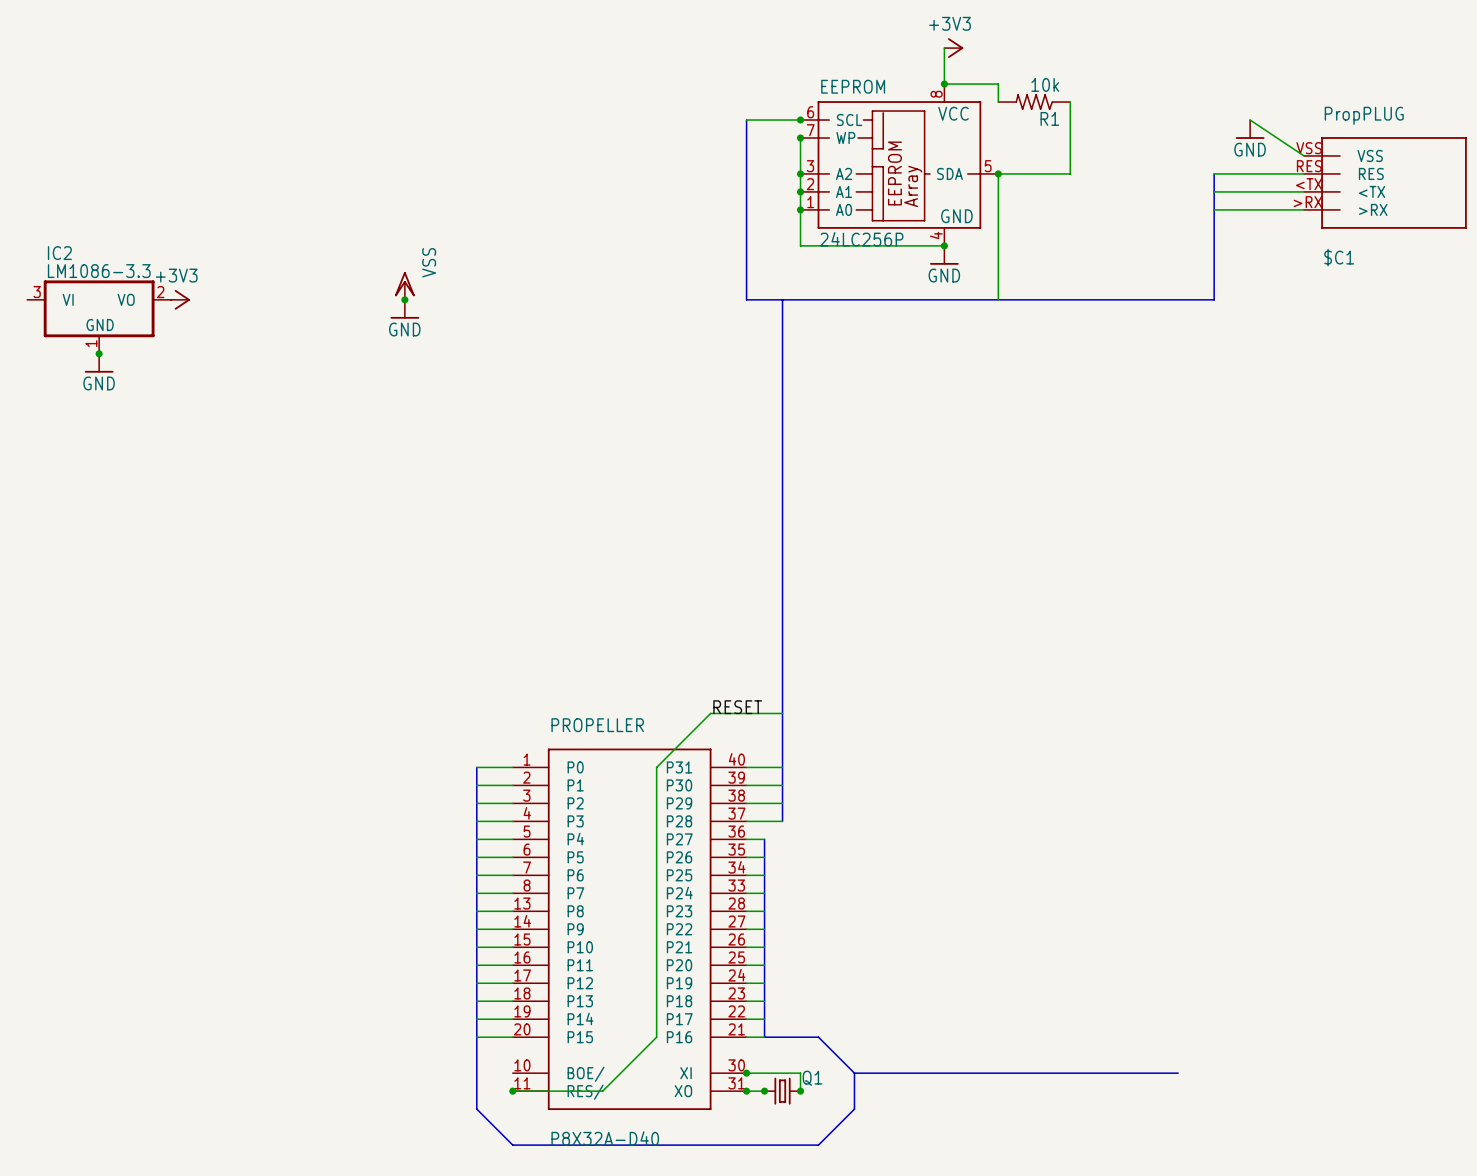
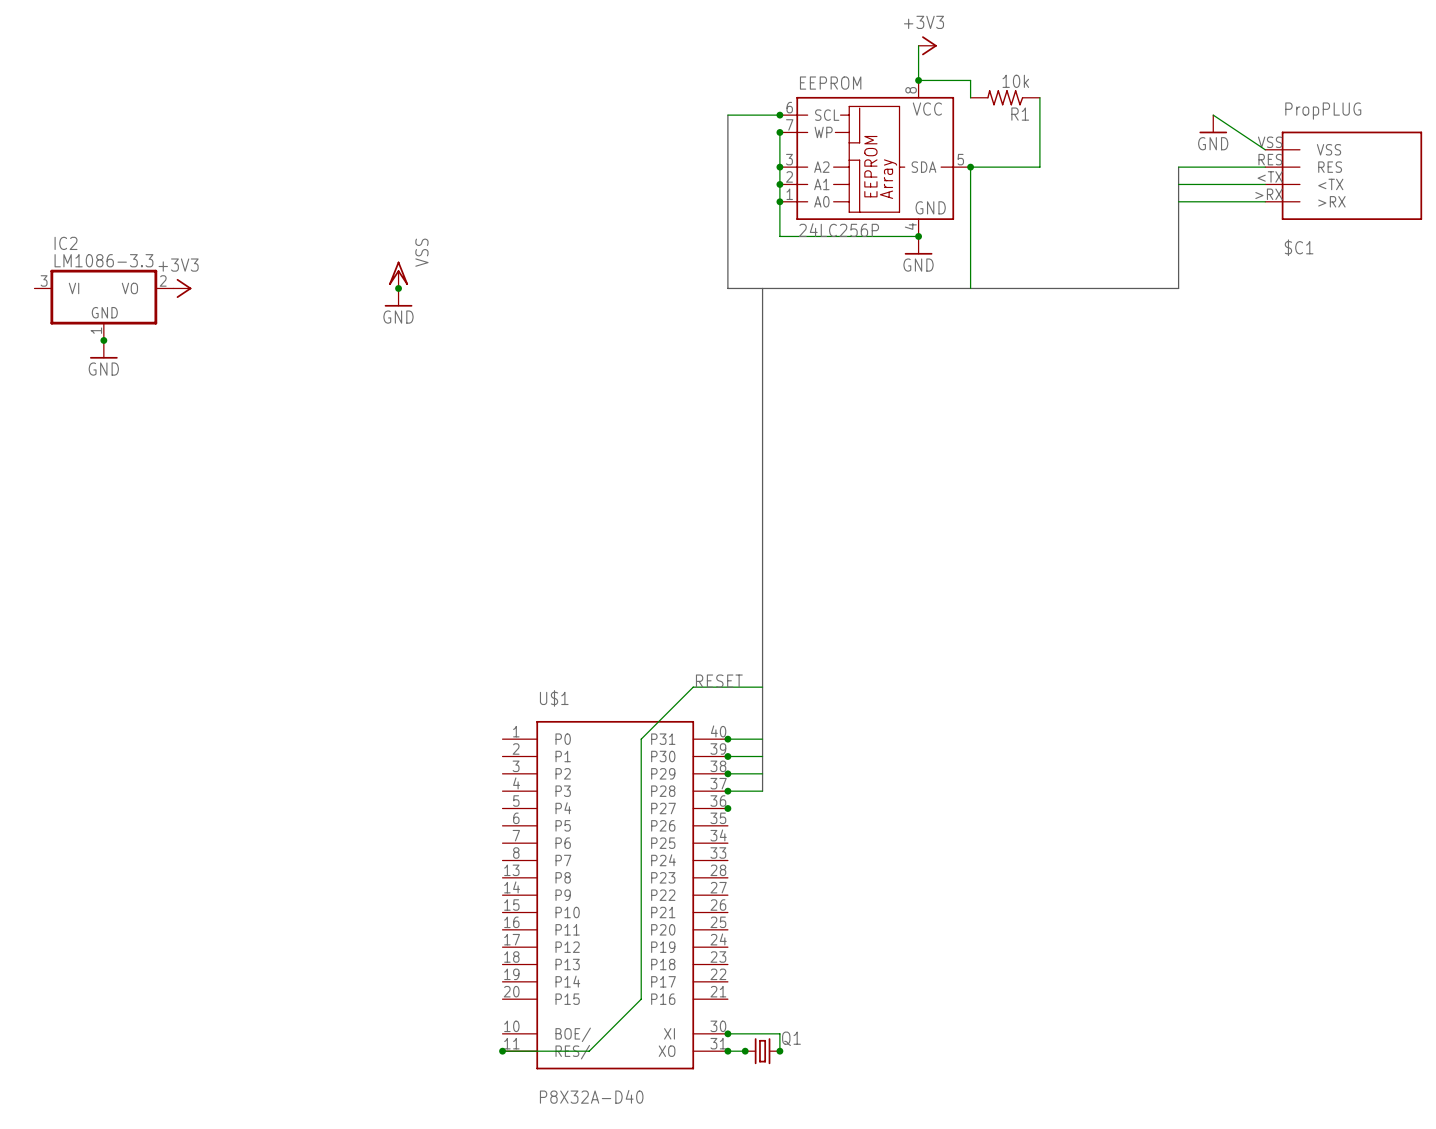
PROPELLER name: PROPELLER (597, 725) -> U$1 (554, 698)
bus: (476, 767) (476, 1109) (512, 1145) (818, 1145) (854, 1109) (854, 1073) -> none
wire: (476, 767) (512, 767) -> none
junction: none -> (727, 739)
wire: (476, 785) (512, 785) -> none
junction: none -> (727, 756)
wire: (476, 803) (512, 803) -> none
junction: none -> (727, 773)
wire: (476, 821) (512, 821) -> none
junction: none -> (727, 791)
wire: (476, 839) (512, 839) -> none
wire: (746, 839) (764, 839) -> none
junction: none -> (727, 808)
bus: (764, 839) (764, 1037) (818, 1037) (854, 1073) -> none
wire: (476, 857) (512, 857) -> none
wire: (746, 857) (764, 857) -> none
wire: (476, 875) (512, 875) -> none
wire: (746, 875) (764, 875) -> none
wire: (476, 893) (512, 893) -> none
wire: (746, 893) (764, 893) -> none
wire: (476, 911) (512, 911) -> none
wire: (746, 911) (764, 911) -> none
wire: (476, 929) (512, 929) -> none
wire: (746, 929) (764, 929) -> none
wire: (476, 947) (512, 947) -> none
wire: (746, 947) (764, 947) -> none
wire: (476, 965) (512, 965) -> none
wire: (746, 965) (764, 965) -> none
wire: (476, 983) (512, 983) -> none
wire: (746, 983) (764, 983) -> none
wire: (476, 1001) (512, 1001) -> none
wire: (746, 1001) (764, 1001) -> none
wire: (476, 1019) (512, 1019) -> none
wire: (746, 1019) (764, 1019) -> none
wire: (476, 1037) (512, 1037) -> none
wire: (746, 1037) (764, 1037) -> none
bus: (854, 1073) (1178, 1073) -> none

